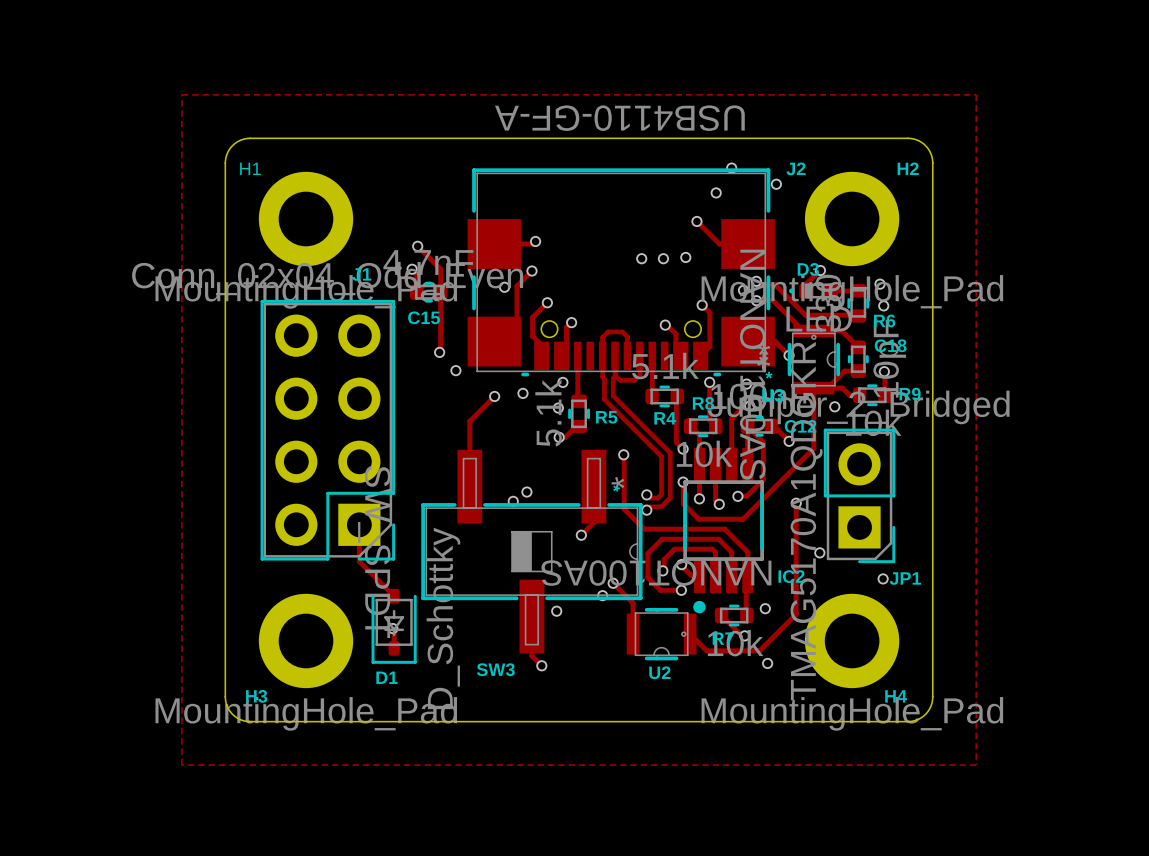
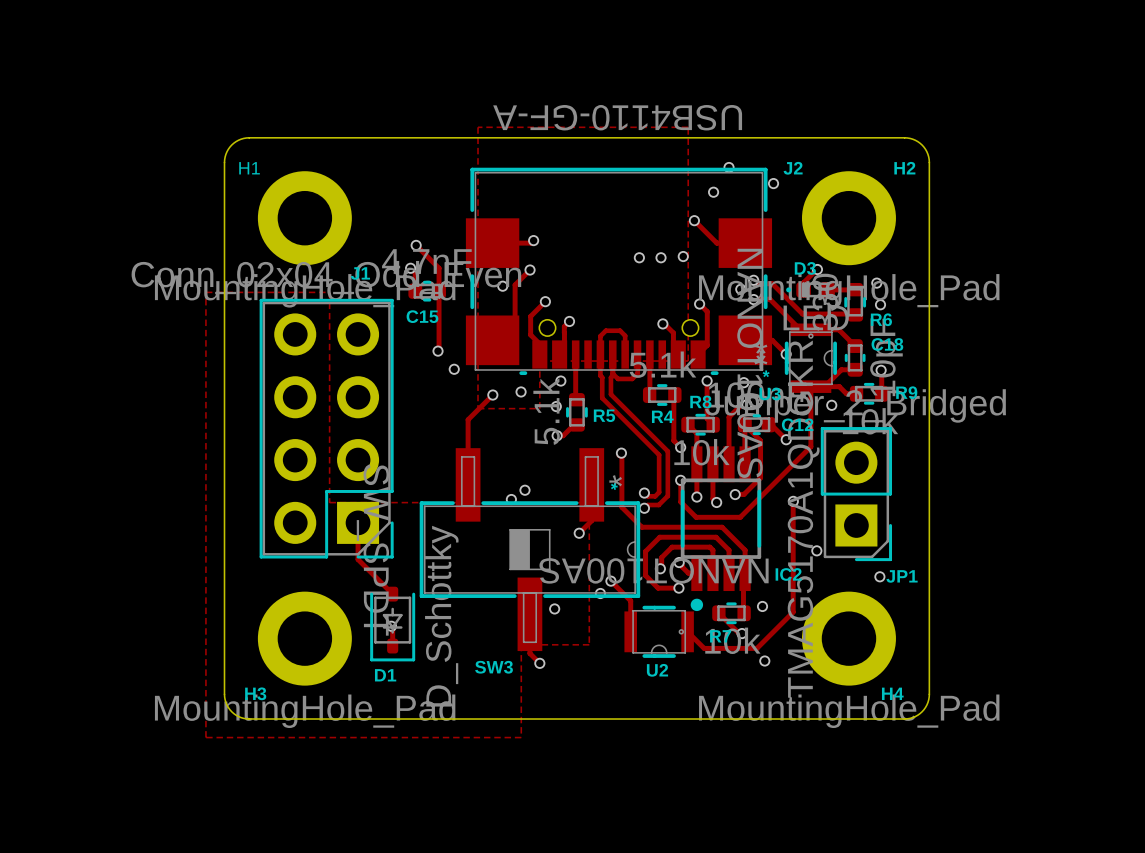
zone outline: (181, 94) (976, 94) (976, 765) (181, 765) (181, 94) -> none
zone outline: none -> (478, 127) (688, 127) (688, 361) (539, 361) (539, 408) (478, 408) (478, 127)
zone outline: none -> (205, 292) (329, 292) (329, 502) (589, 502) (589, 644) (521, 644) (521, 737) (205, 737) (205, 292)

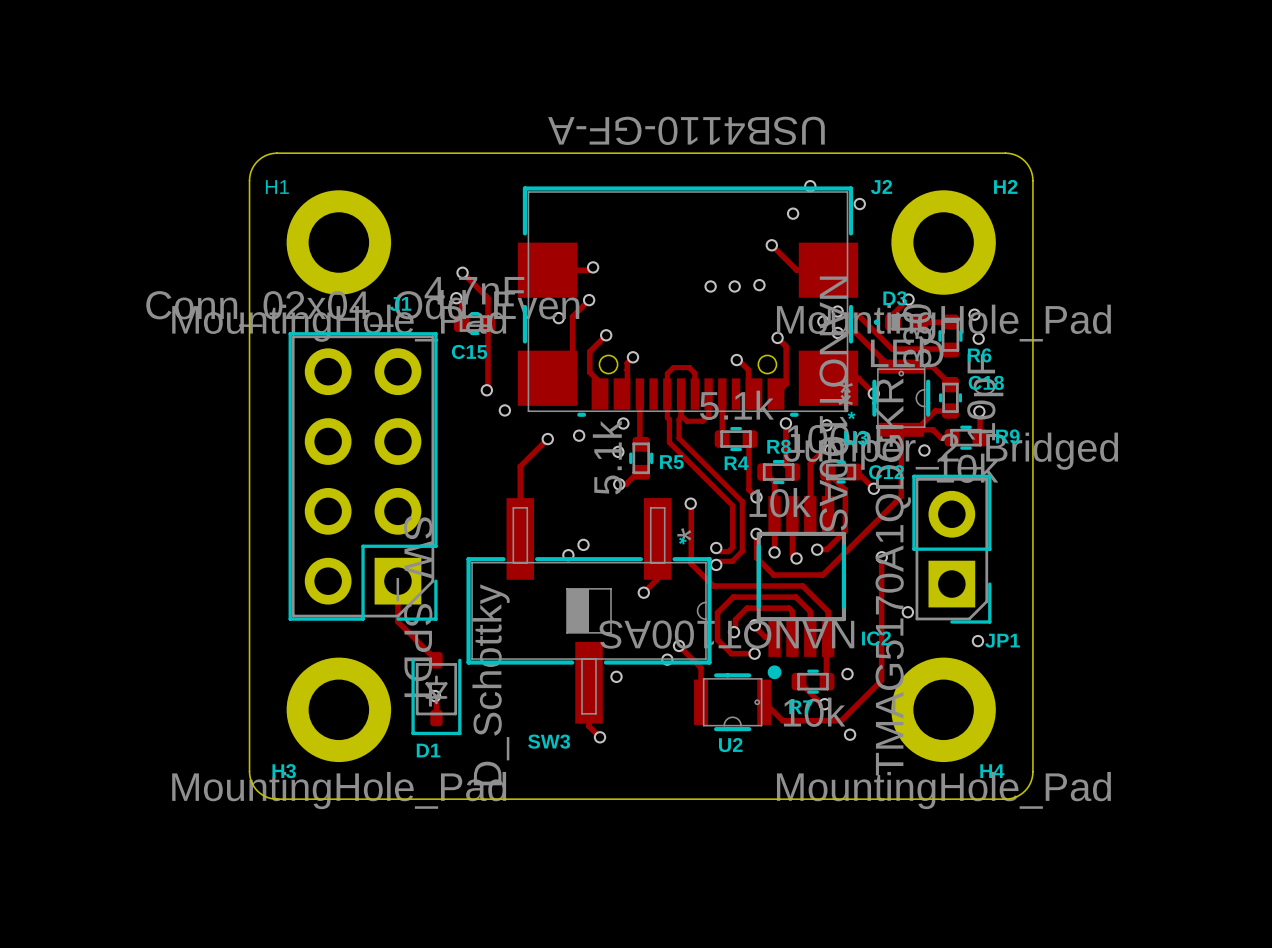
zone outline: (478, 127) (688, 127) (688, 361) (539, 361) (539, 408) (478, 408) (478, 127) -> none
zone outline: (205, 292) (329, 292) (329, 502) (589, 502) (589, 644) (521, 644) (521, 737) (205, 737) (205, 292) -> none

